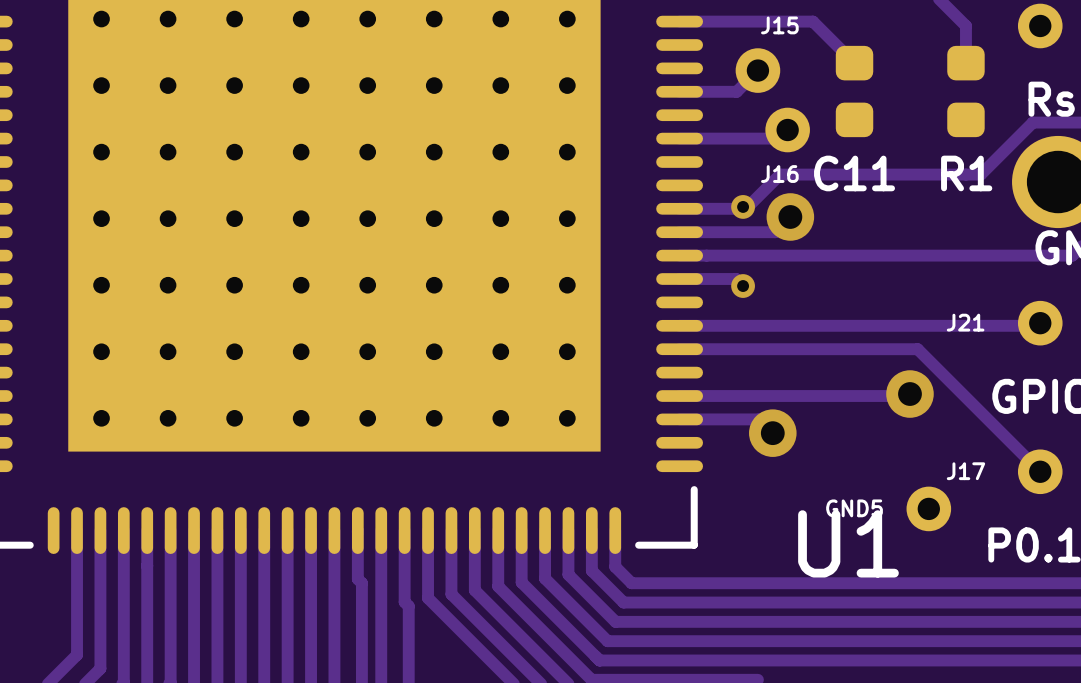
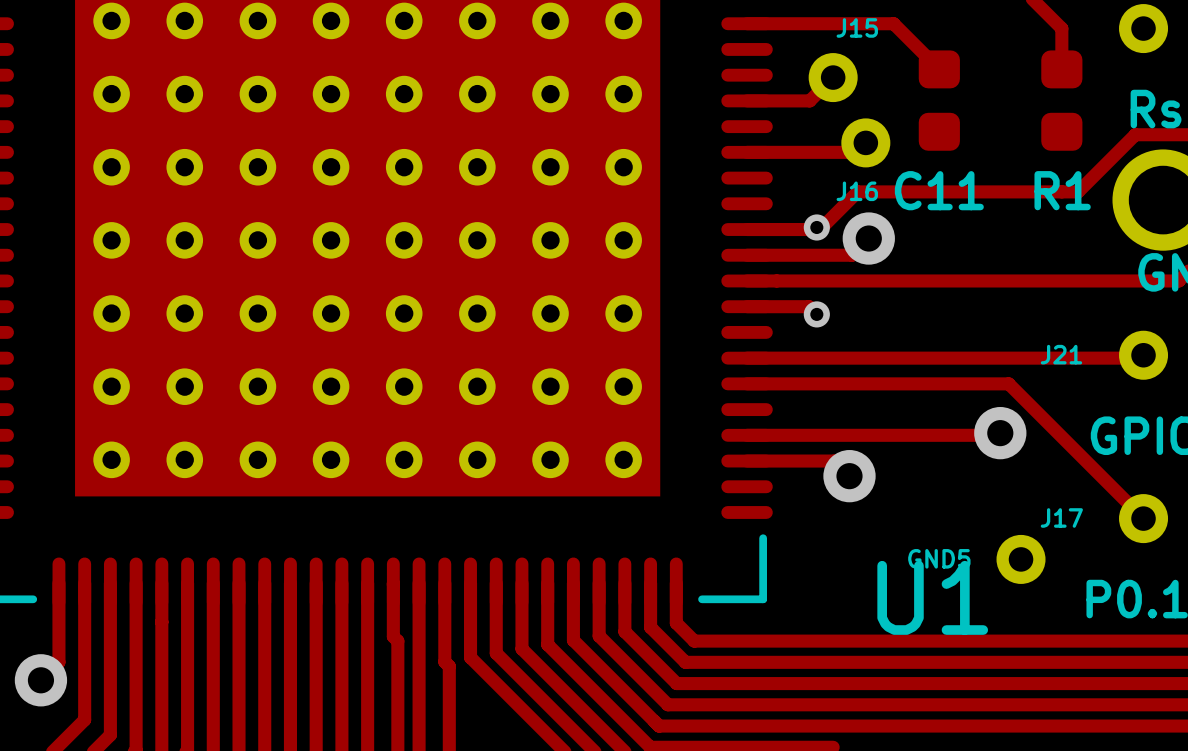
track: none -> (58, 583) (58, 662) (40, 680)
via: none -> (40, 680)

